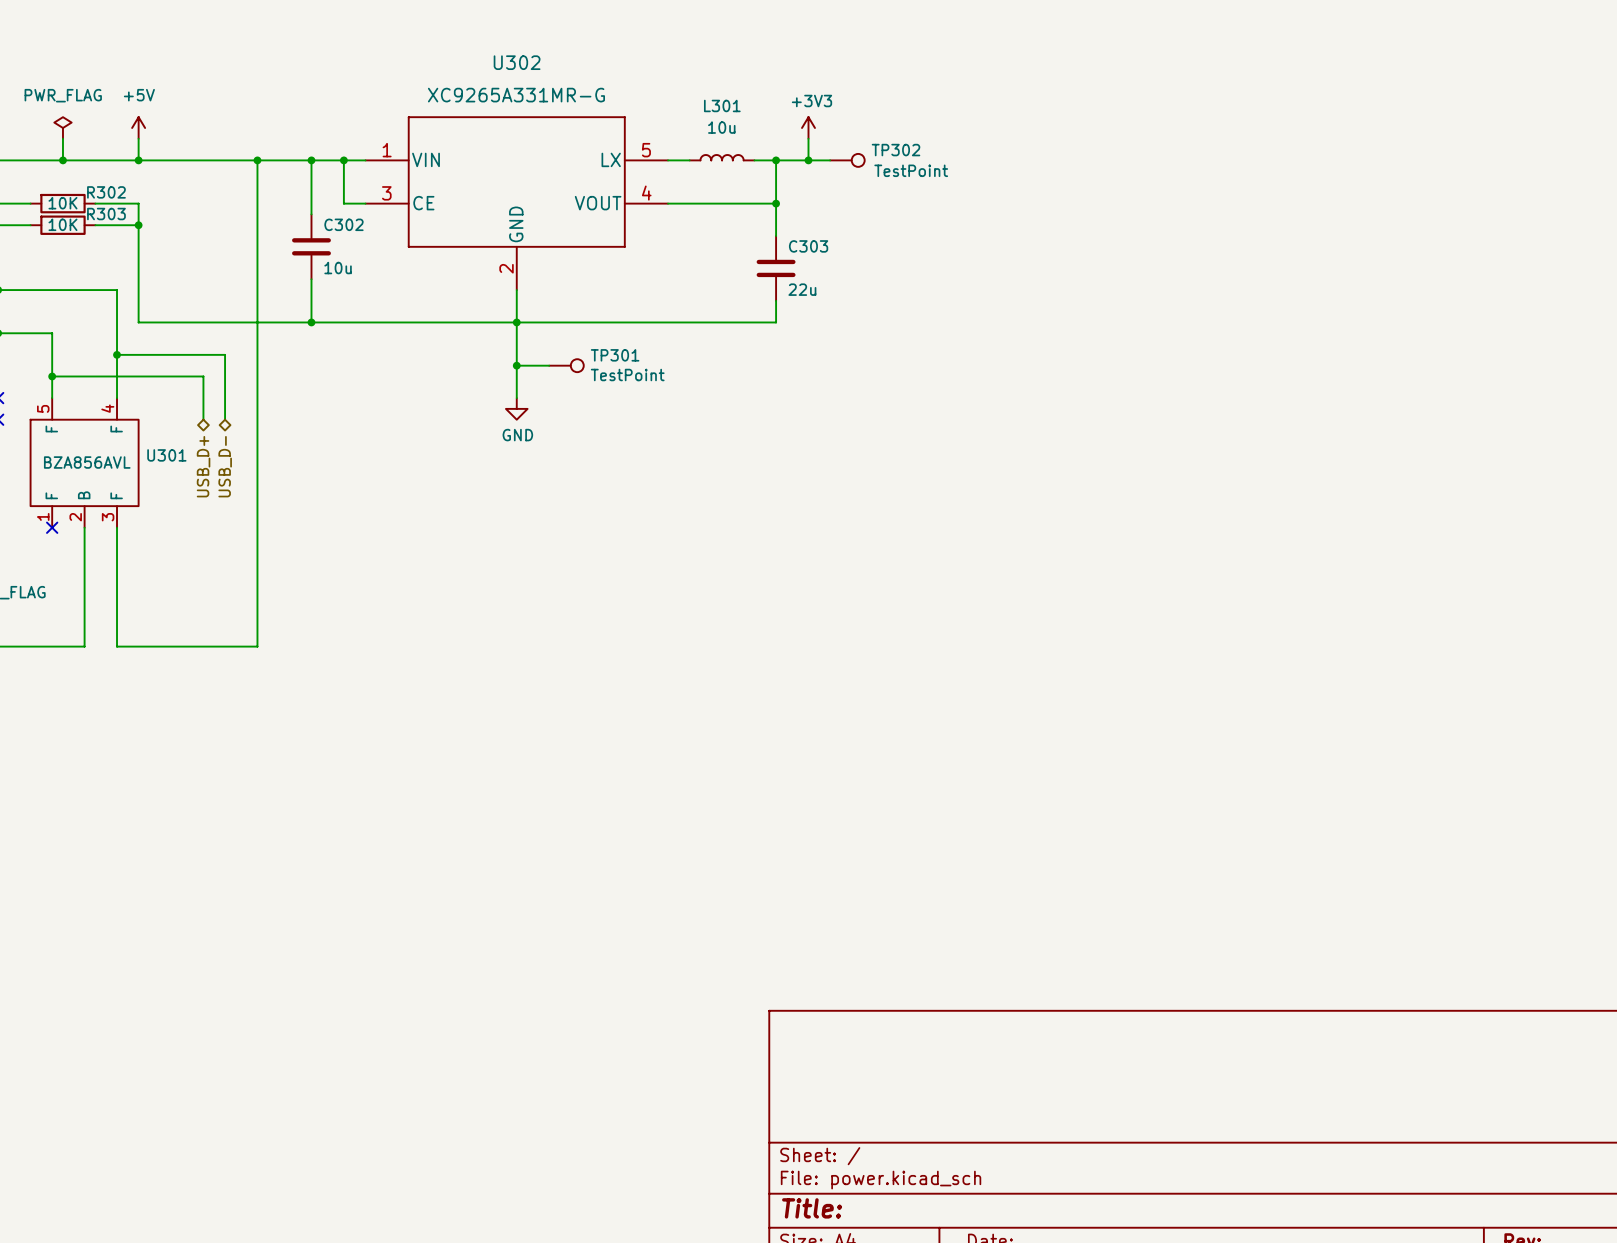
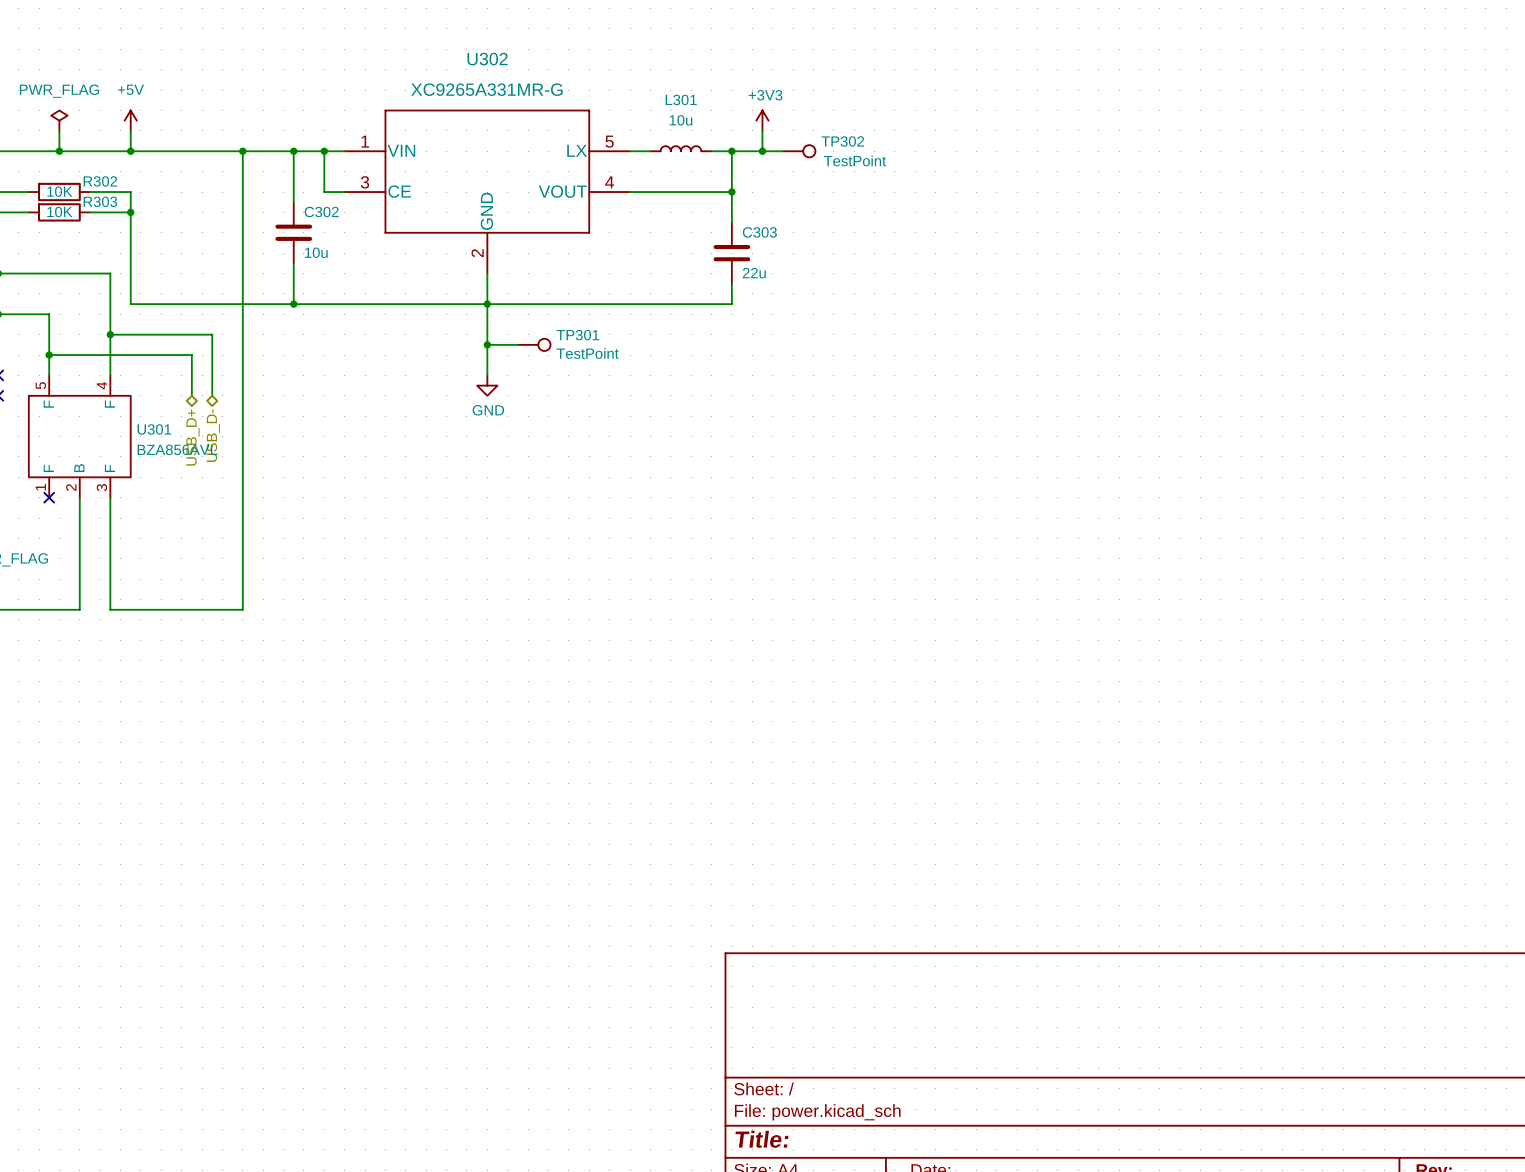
U301 value position: BZA856AVL (87, 462) -> BZA856AVL (177, 449)

